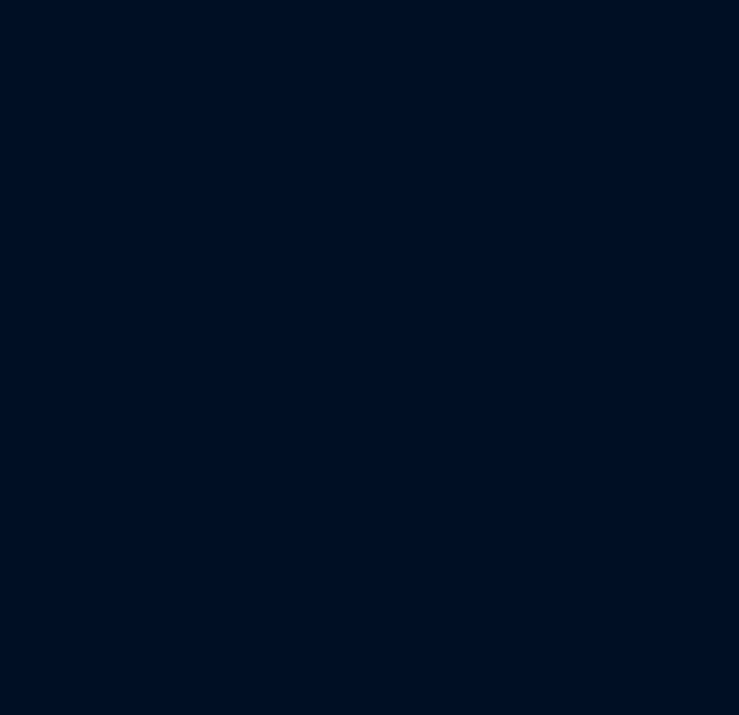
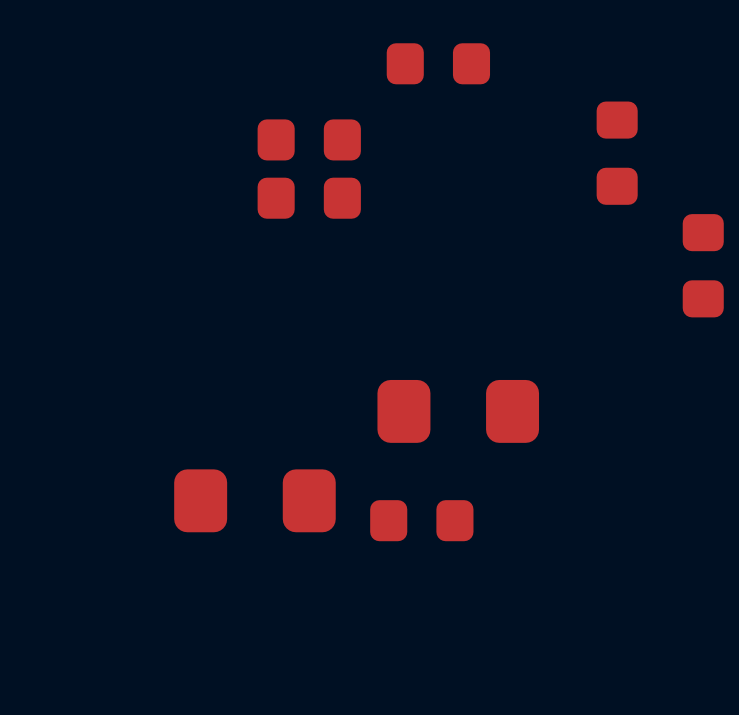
part: none -> (438, 63)
part: none -> (309, 139)
part: none -> (617, 153)
part: none -> (309, 198)
part: none -> (703, 265)
part: none -> (458, 411)
part: none -> (254, 500)
part: none -> (421, 520)

